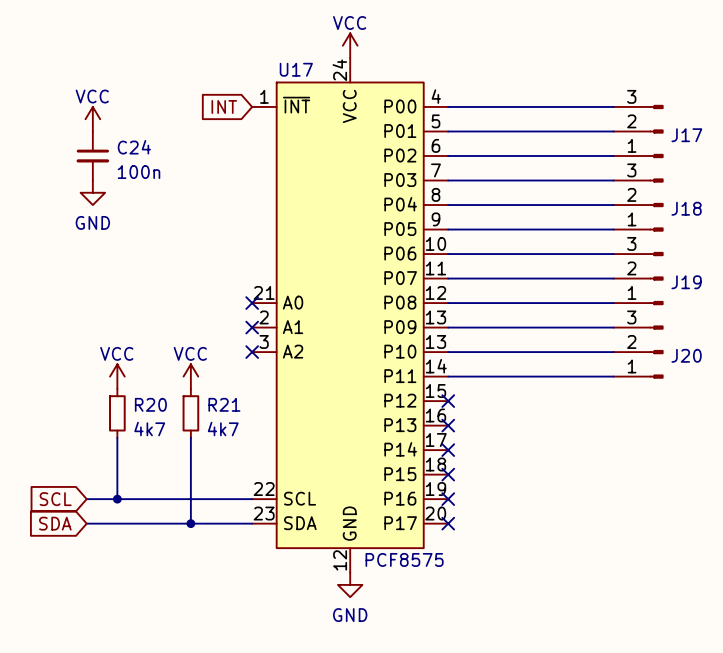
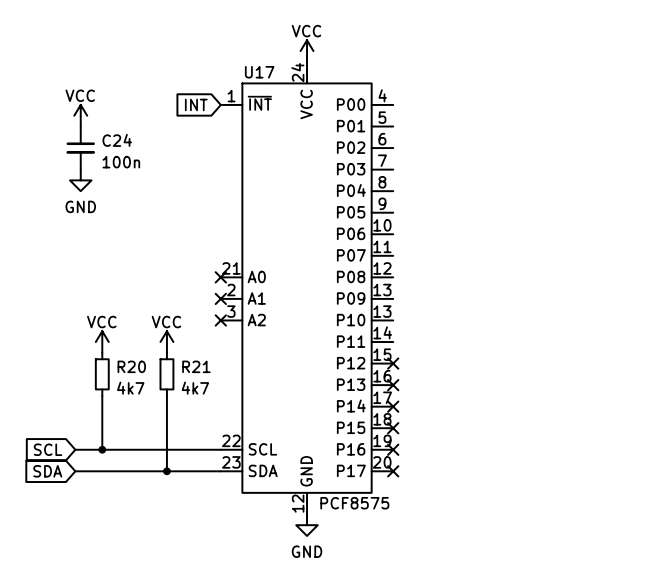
wire: (448, 106) (613, 106) -> none
wire: (448, 131) (613, 131) -> none
J17: (638, 131) -> none
wire: (448, 156) (613, 156) -> none
wire: (448, 180) (613, 180) -> none
wire: (448, 205) (613, 205) -> none
J18: (638, 205) -> none
wire: (448, 229) (613, 229) -> none
wire: (448, 254) (613, 254) -> none
wire: (448, 278) (613, 278) -> none
J19: (638, 278) -> none
wire: (448, 303) (613, 303) -> none
wire: (448, 327) (613, 327) -> none
wire: (448, 352) (613, 352) -> none
J20: (638, 352) -> none
wire: (448, 376) (613, 376) -> none

